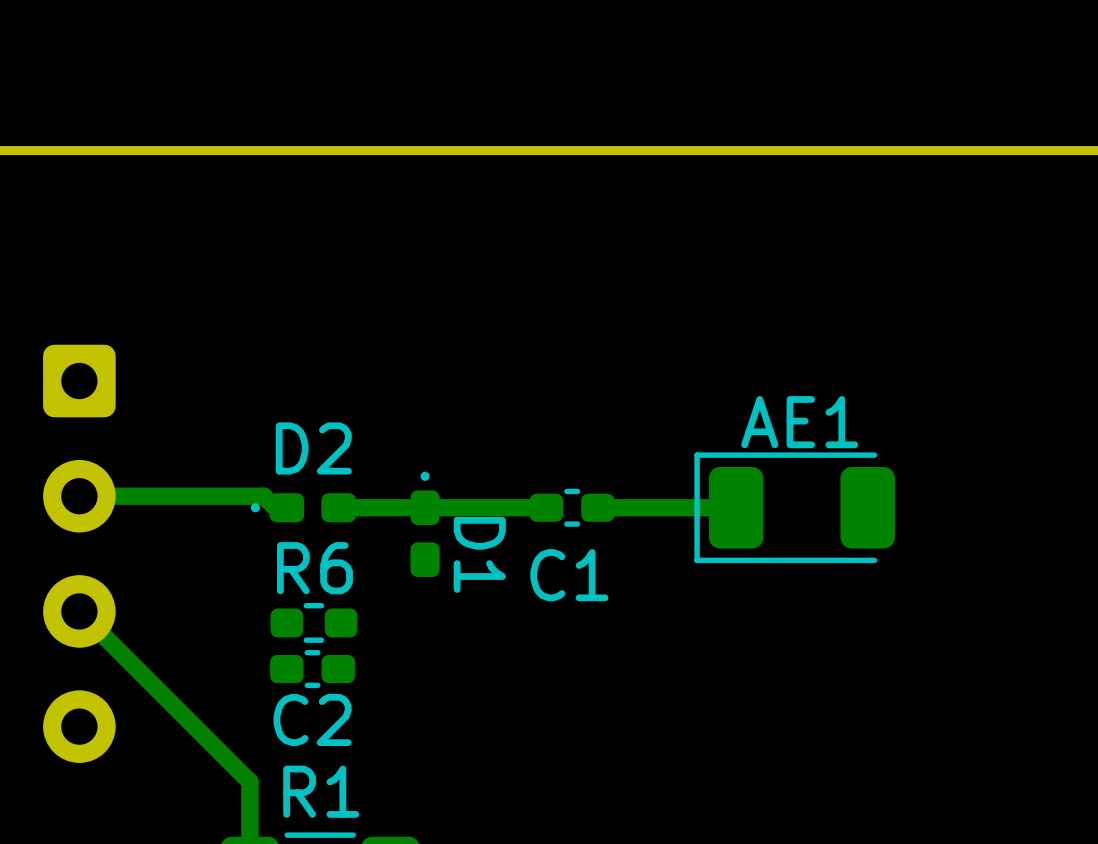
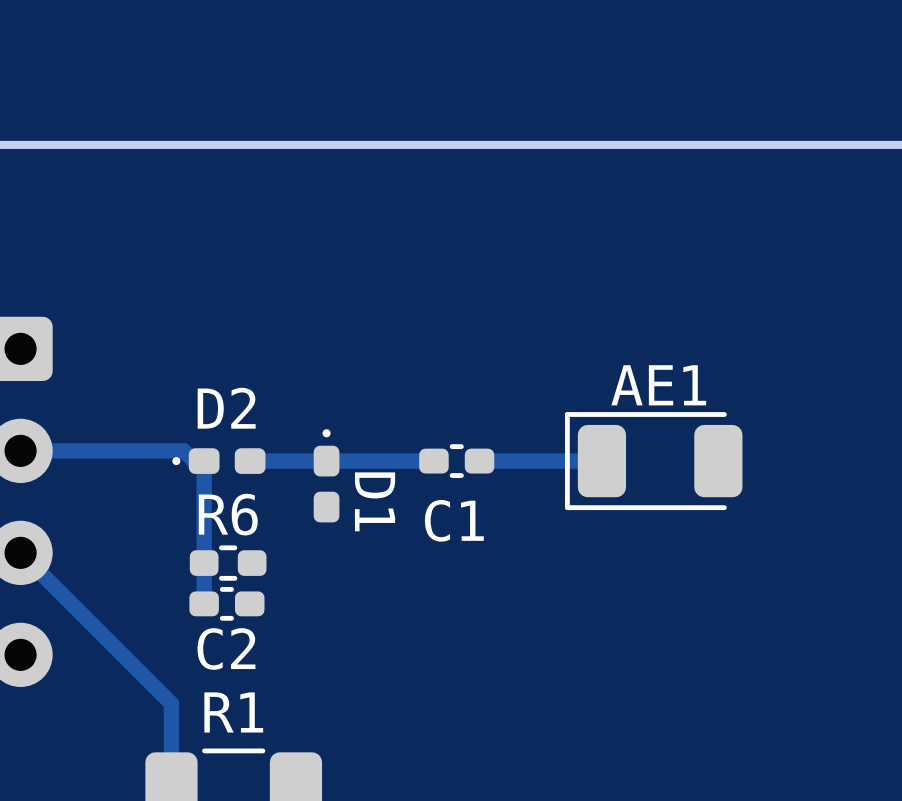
track: none -> (204, 461) (204, 603)

